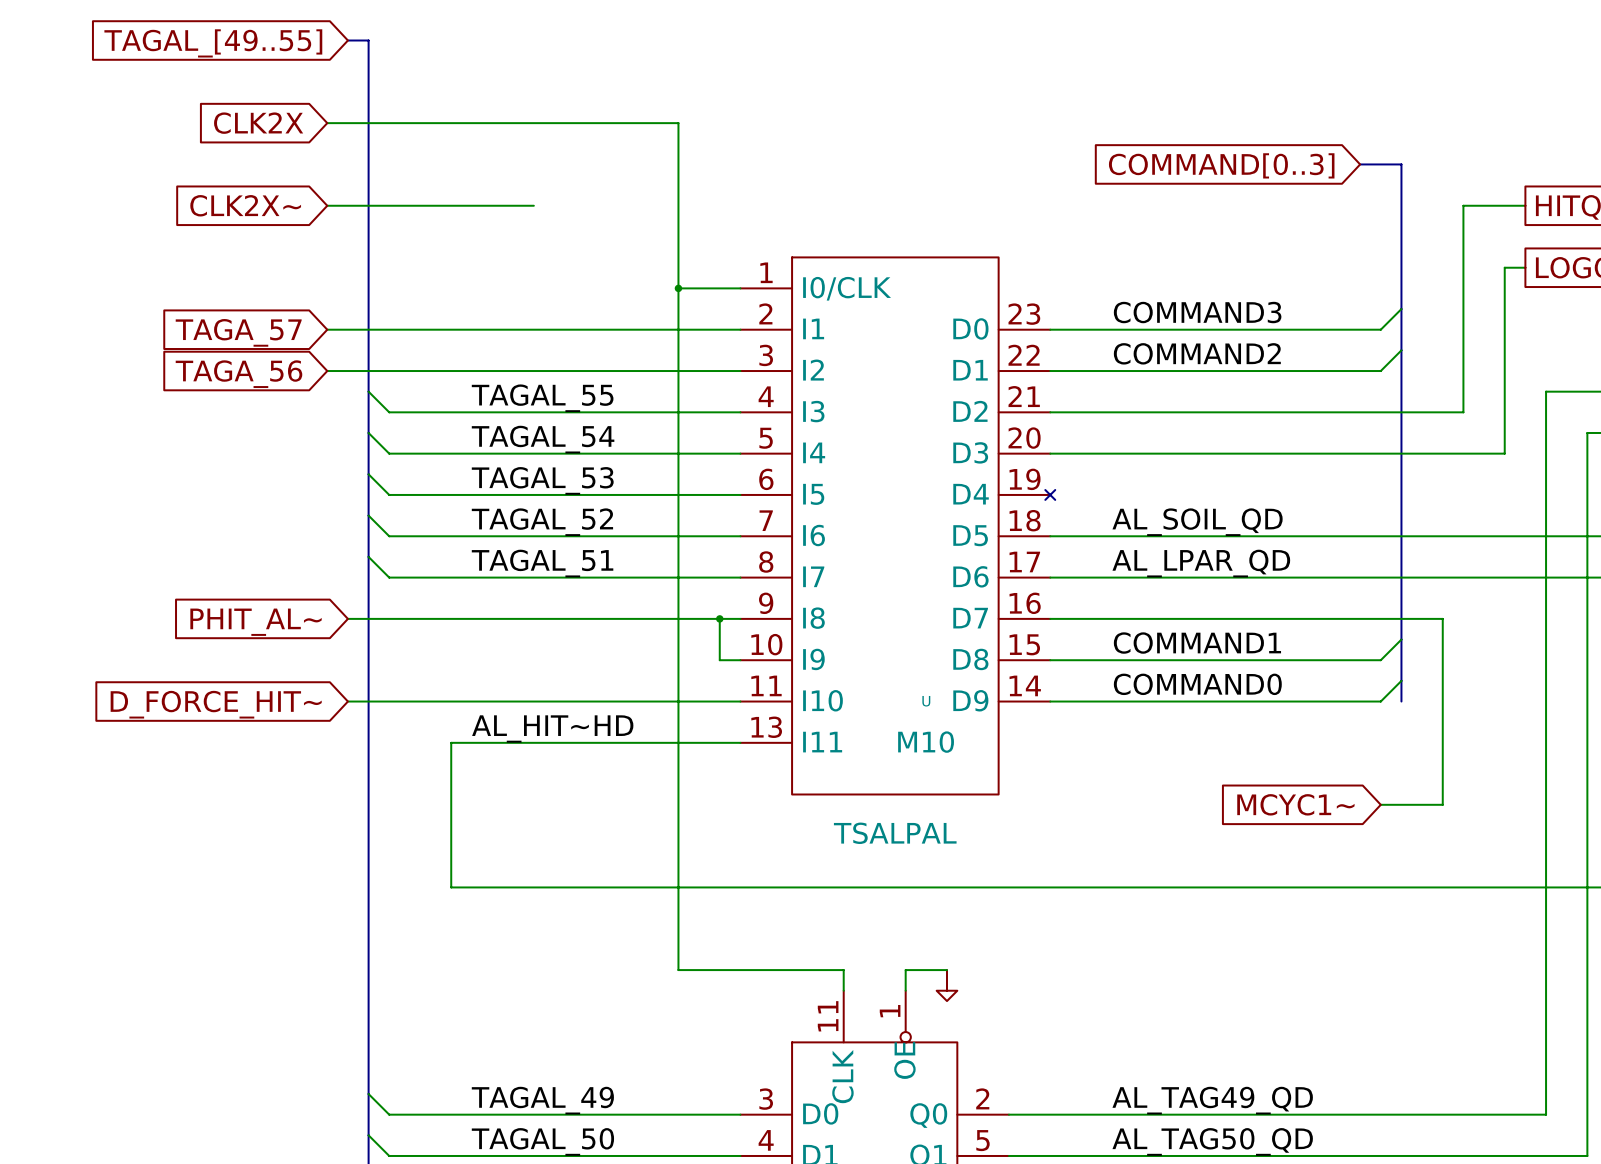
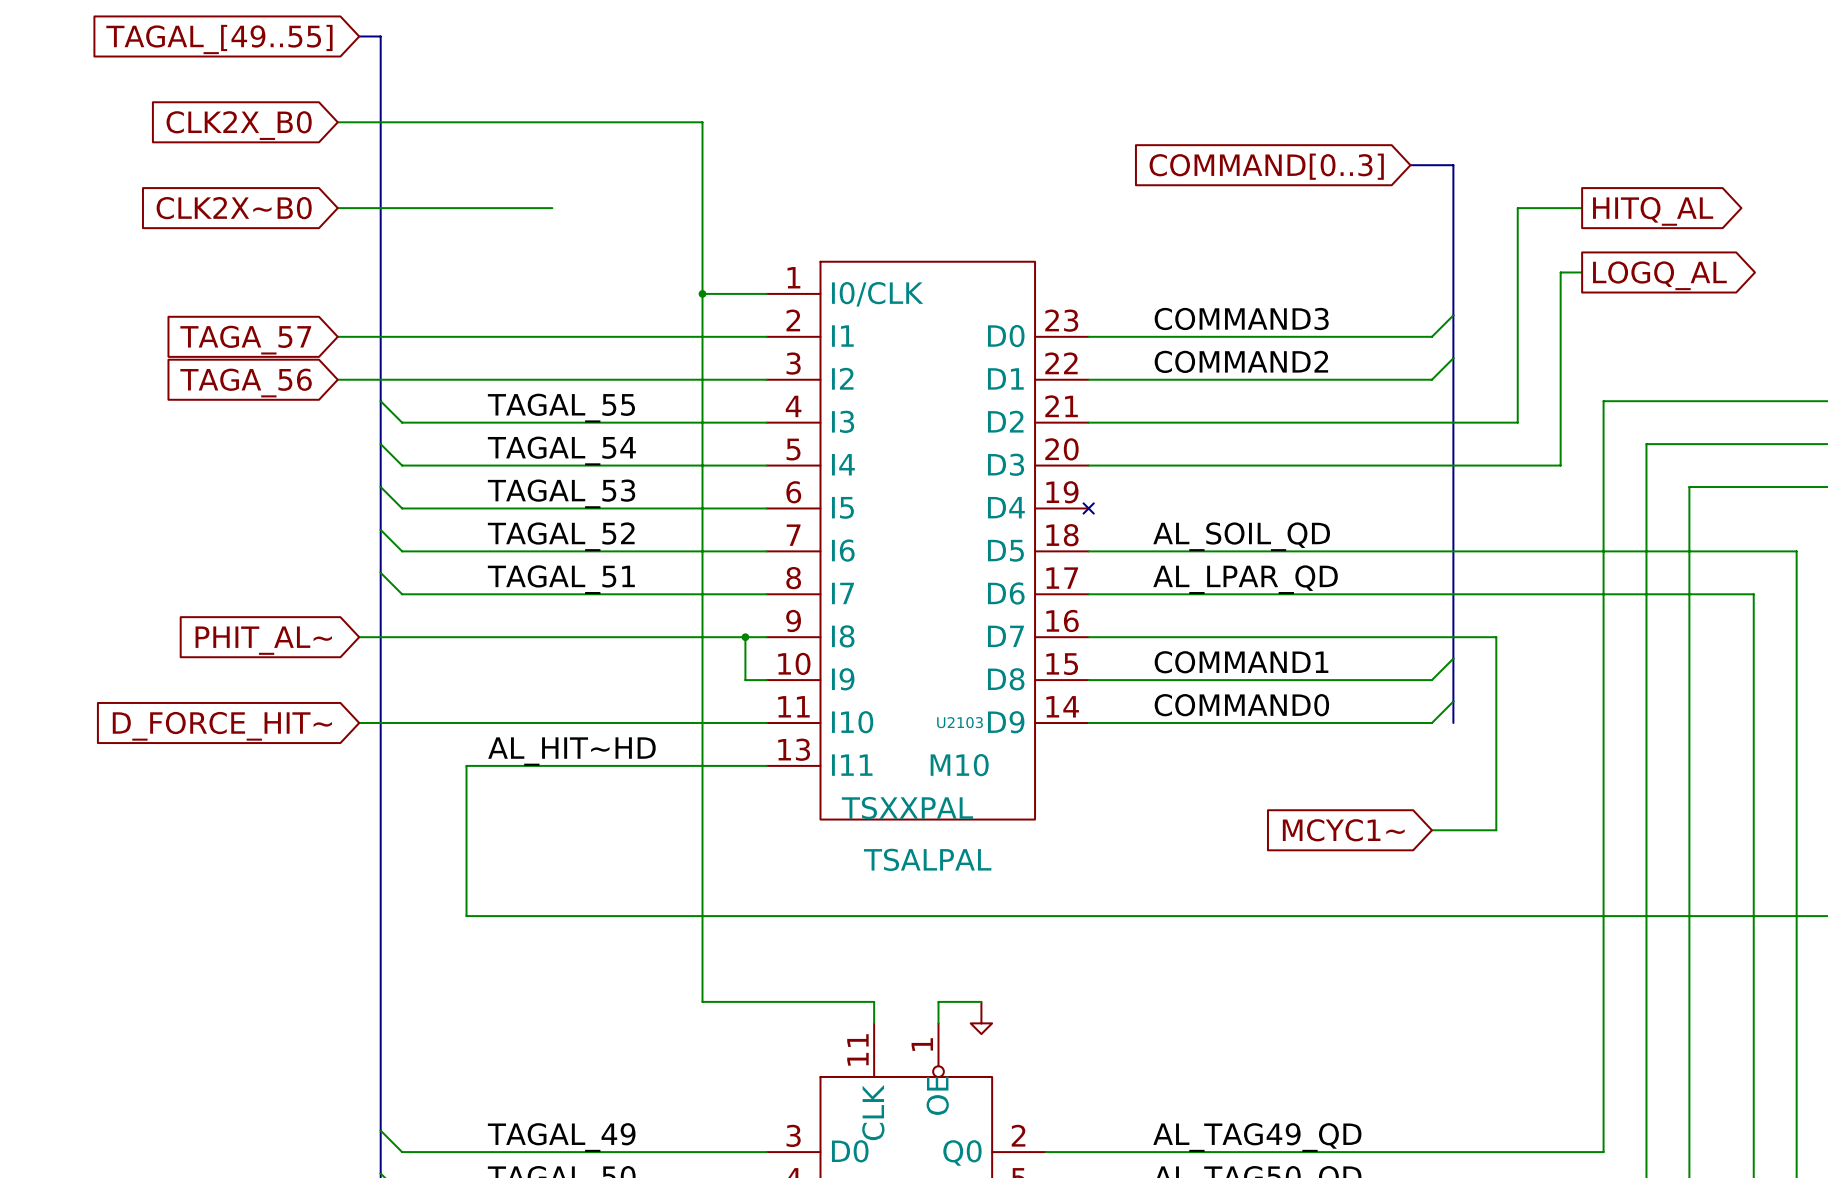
global label: CLK2X (258, 123) -> CLK2X_B0 (239, 125)
global label: CLK2X~ (245, 205) -> CLK2X~B0 (234, 208)
U name: U (926, 701) -> U2103 (960, 722)
U value: none -> TSXXPAL (907, 808)

